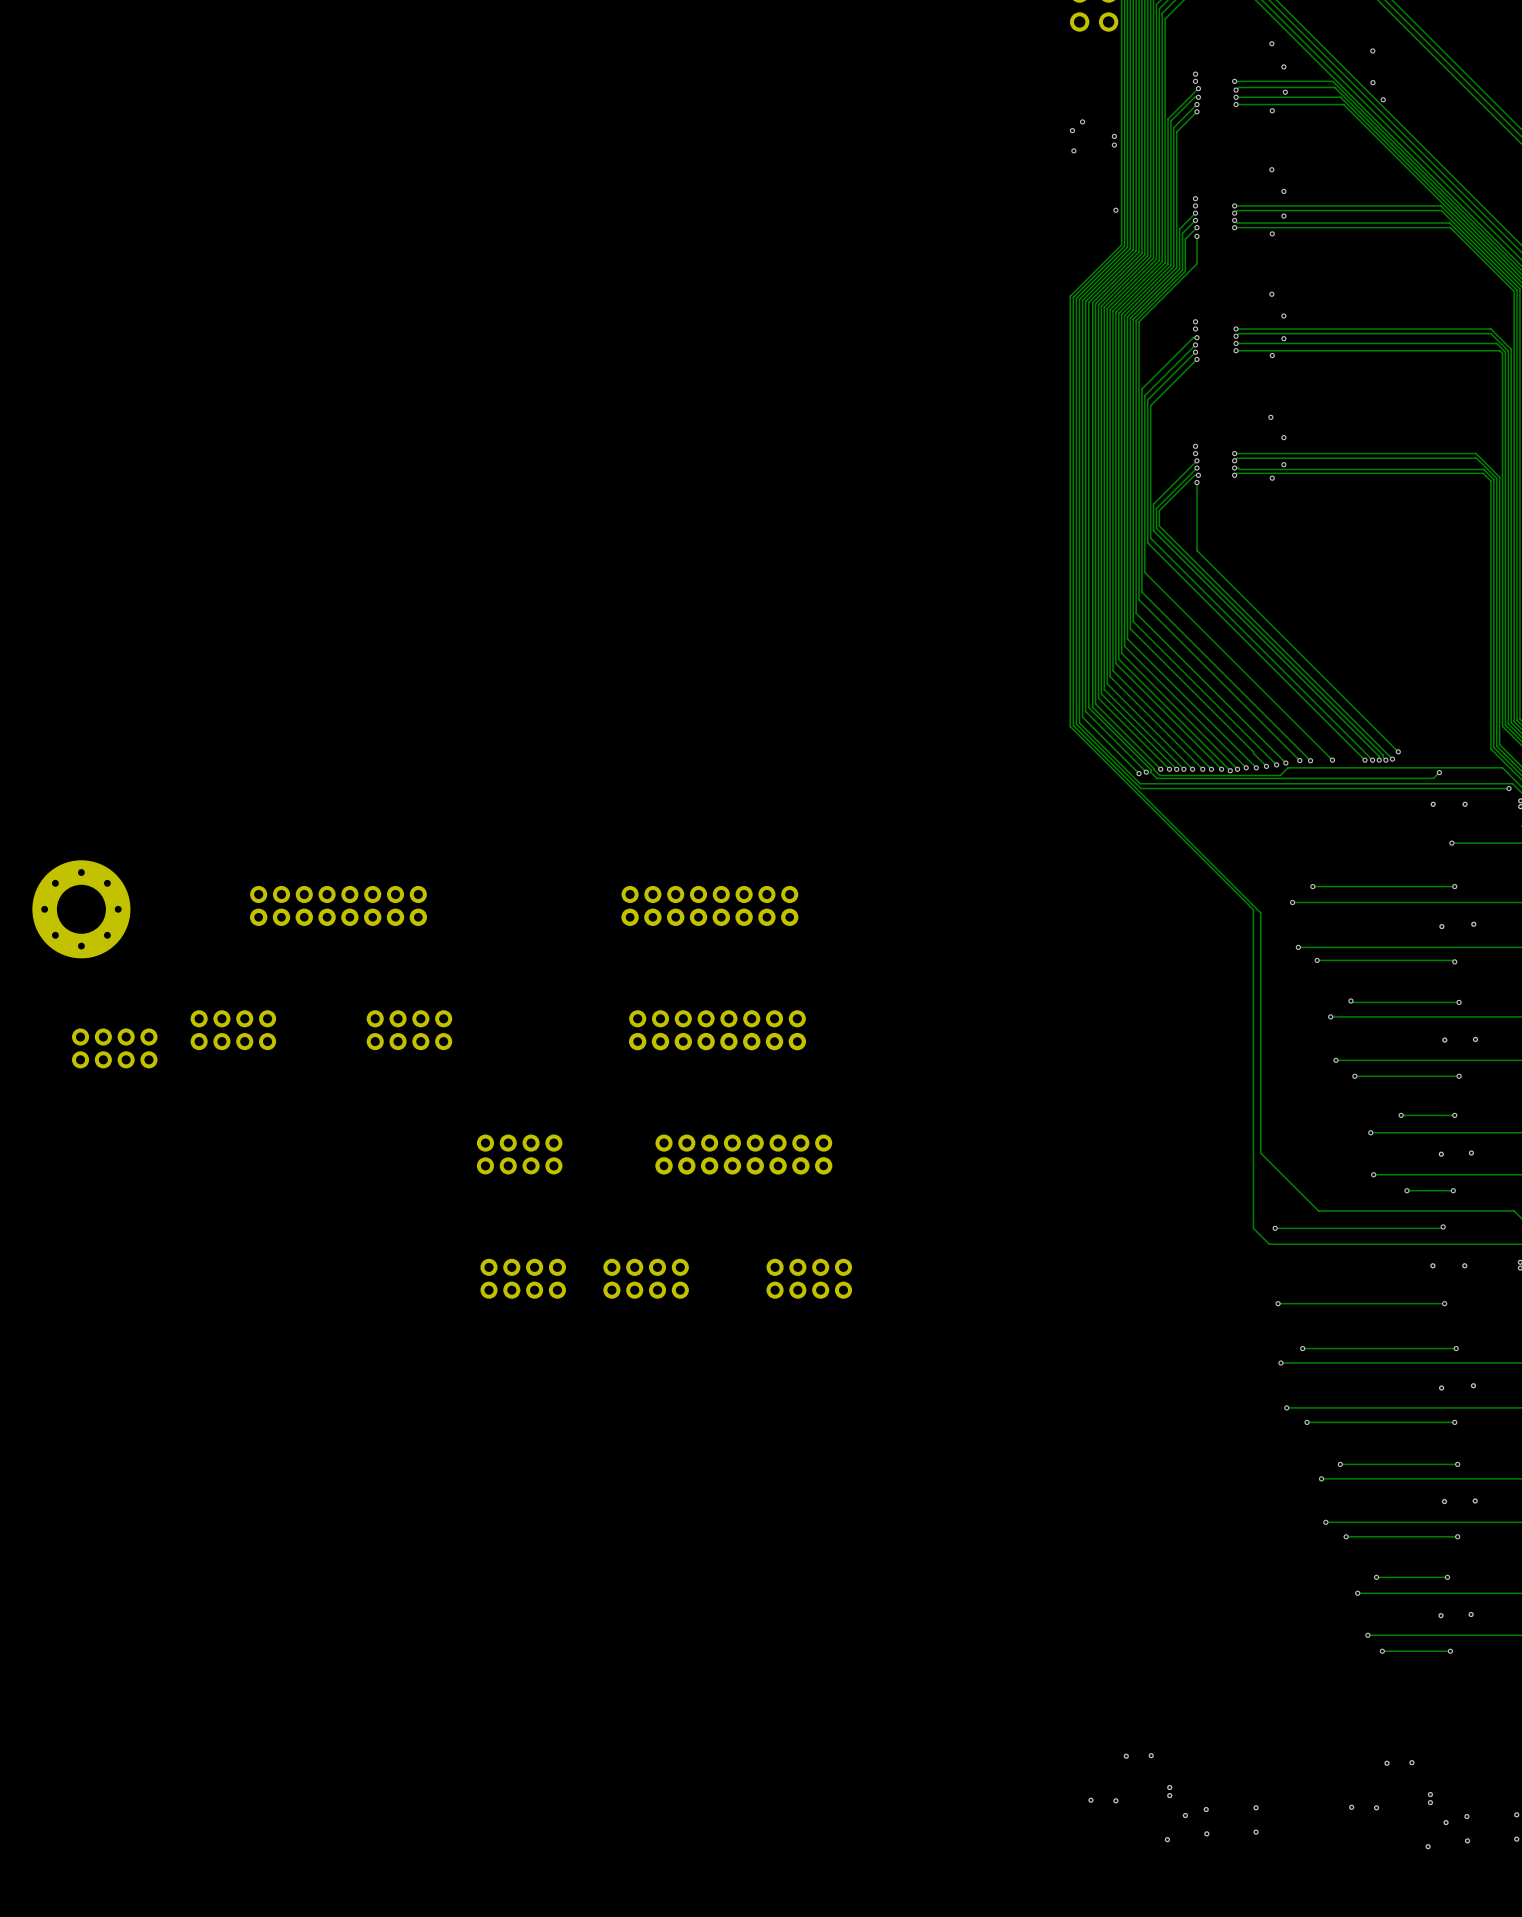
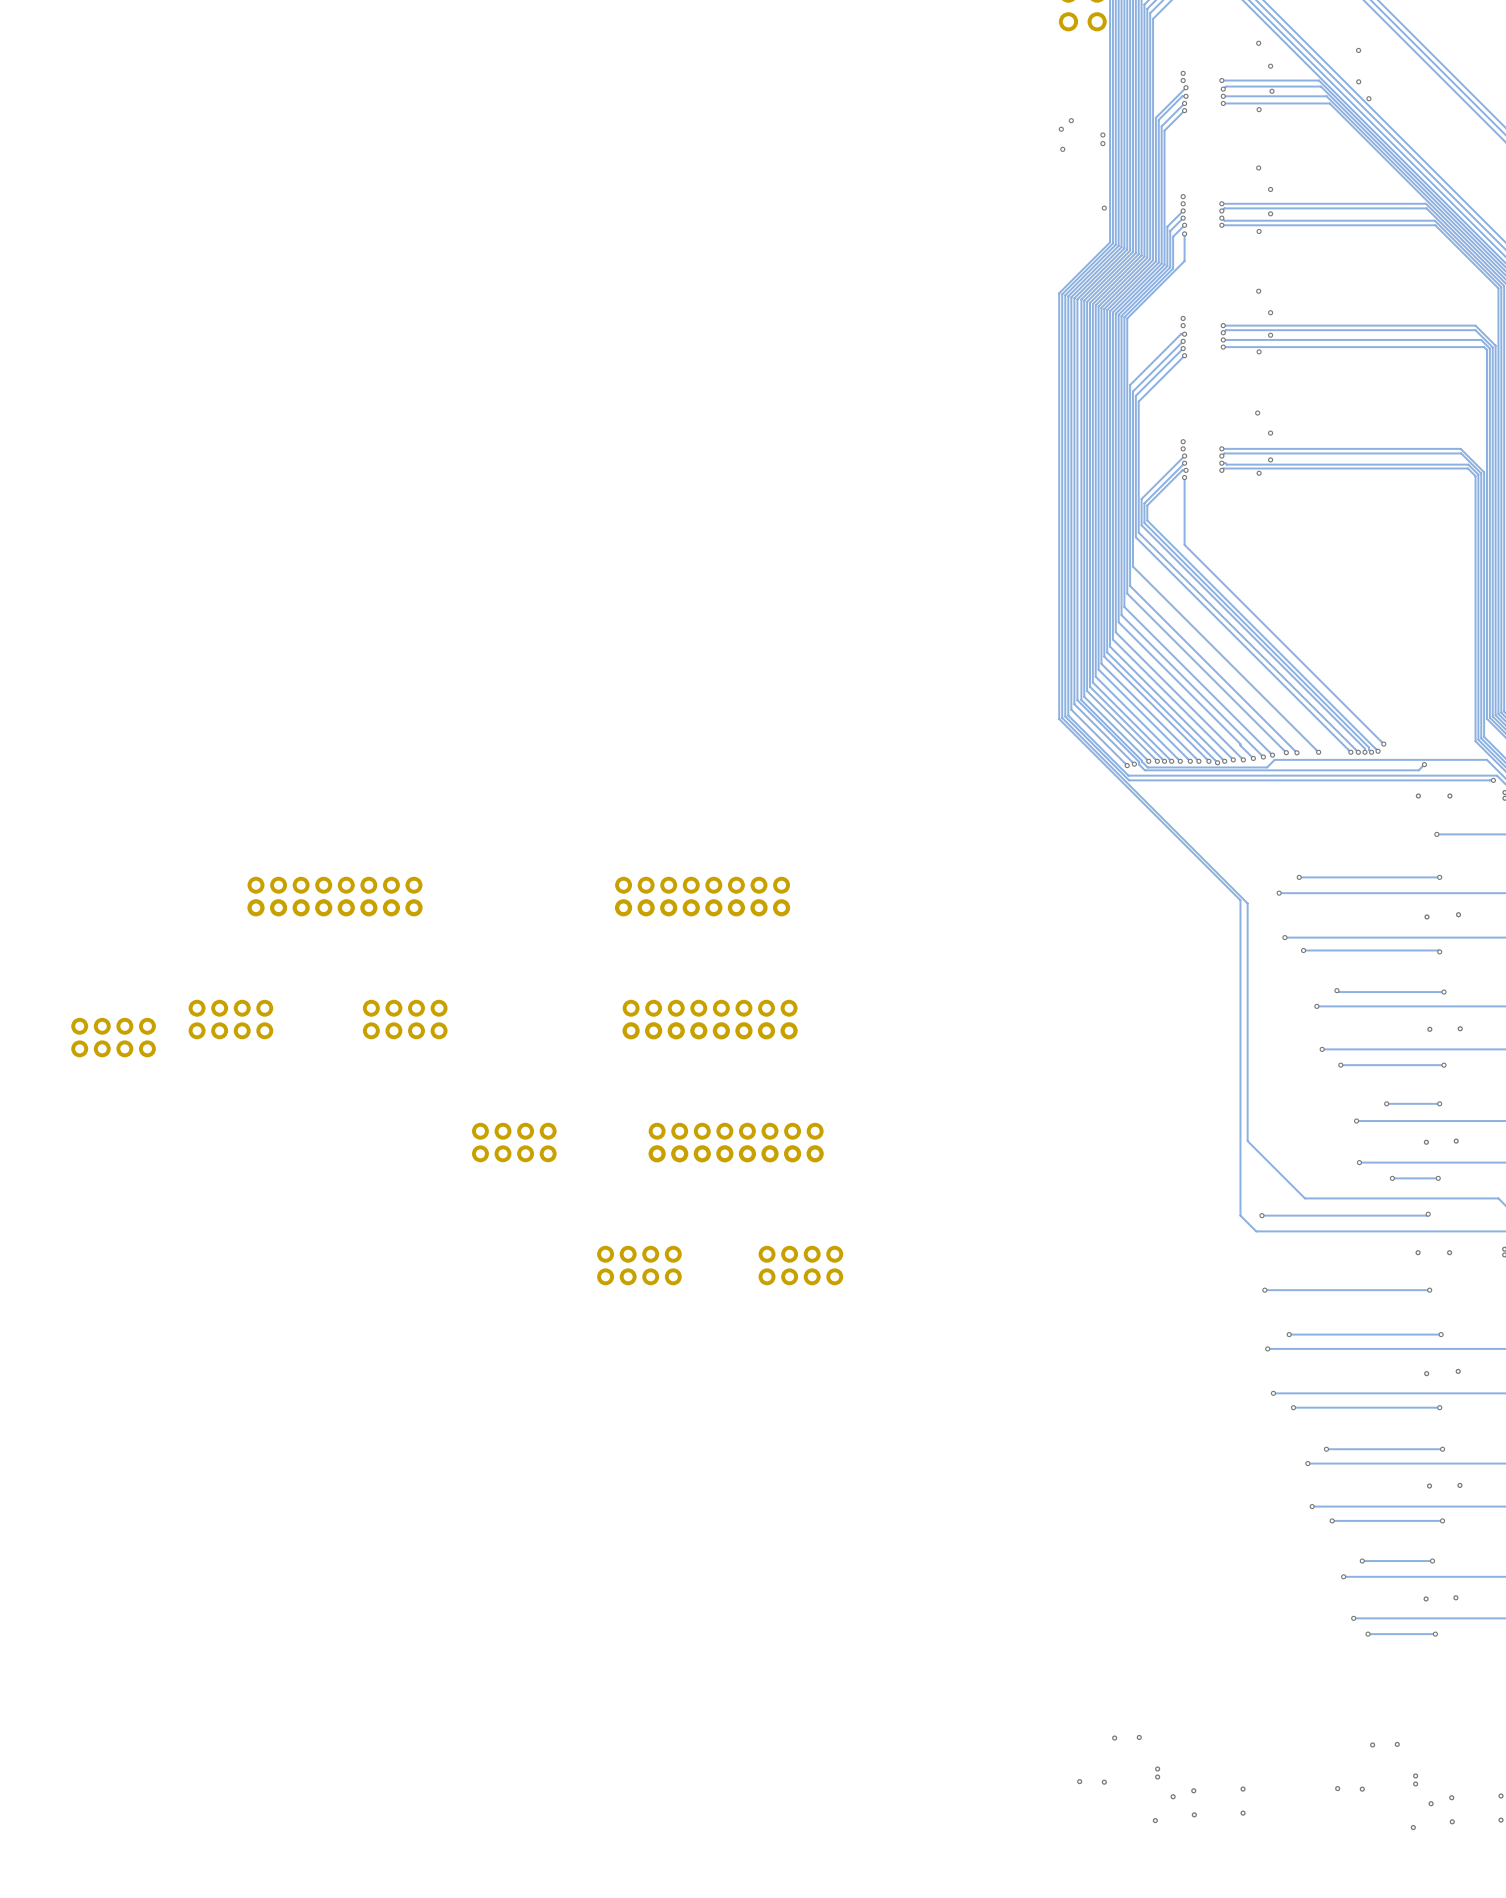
part: (81, 909) -> none
part: (523, 1278) -> none

